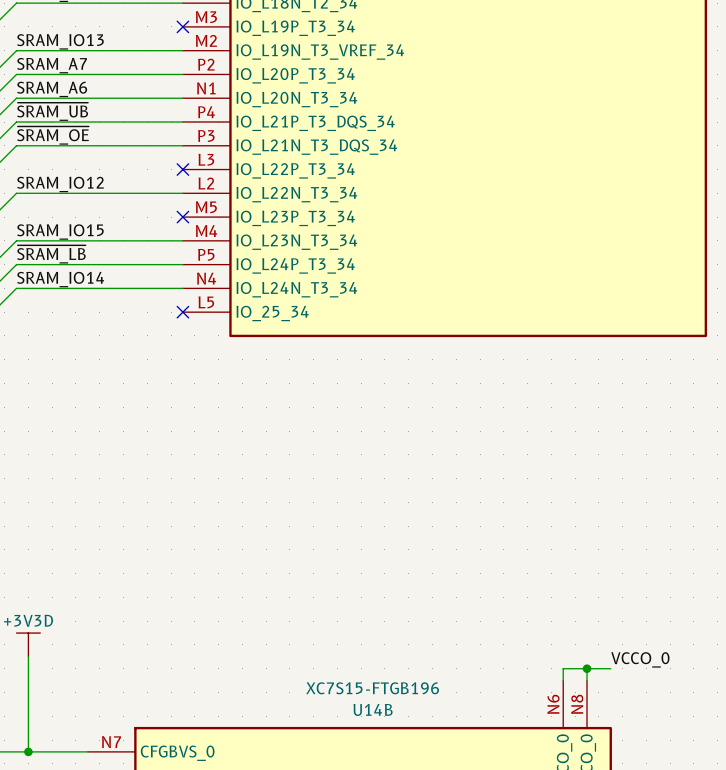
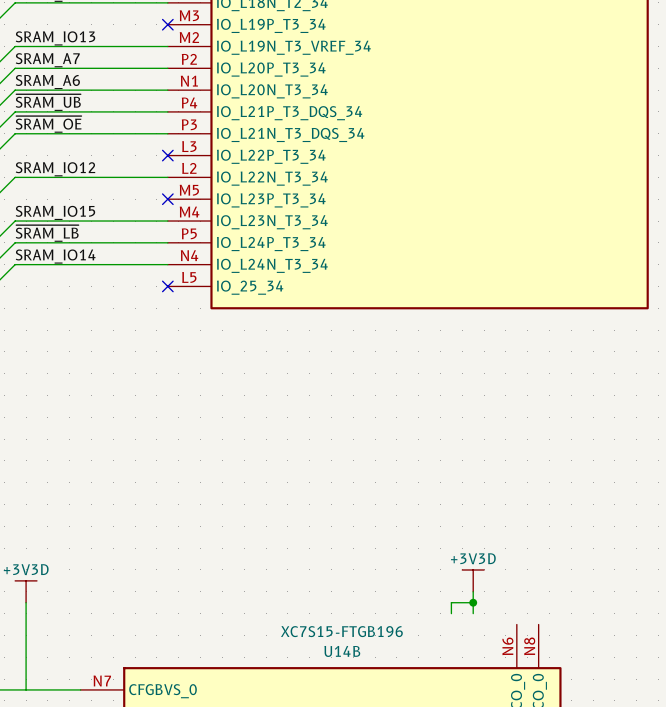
power symbol: none -> +3V3D (473, 580)
wire: none -> (473, 591) (473, 613)
wire: none -> (473, 602) (451, 602) (451, 613)
junction: none -> (473, 602)
label: VCCO_0 (640, 659) -> none
wire: (587, 668) (587, 680) -> none
junction: (587, 668) -> none
wire: (610, 668) (563, 668) (563, 680) -> none
junction: (28, 751) -> none

